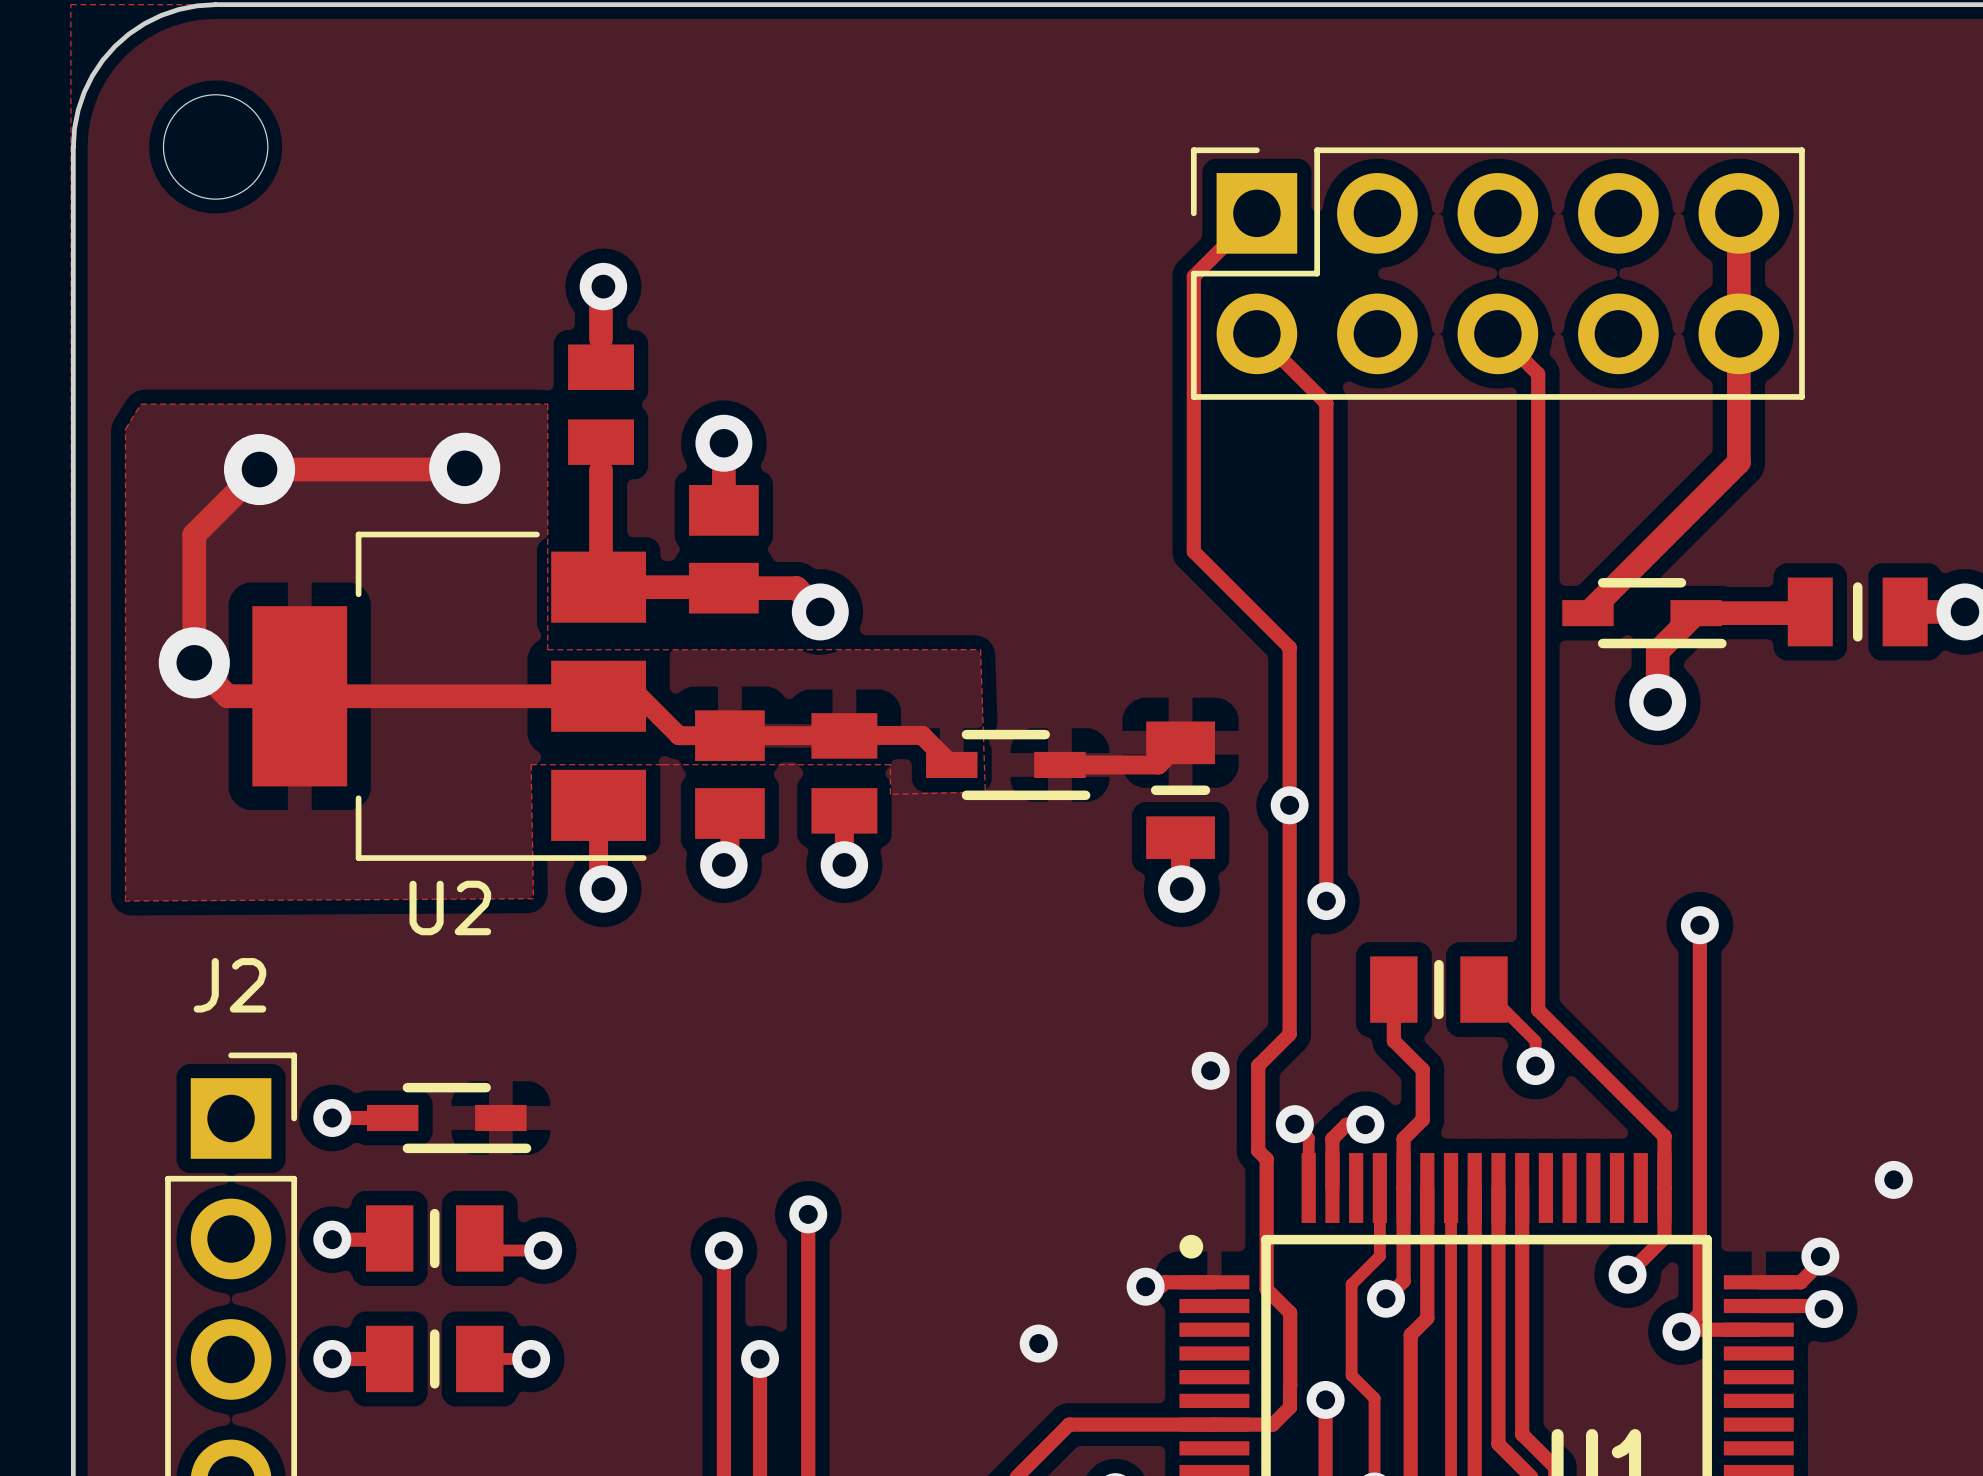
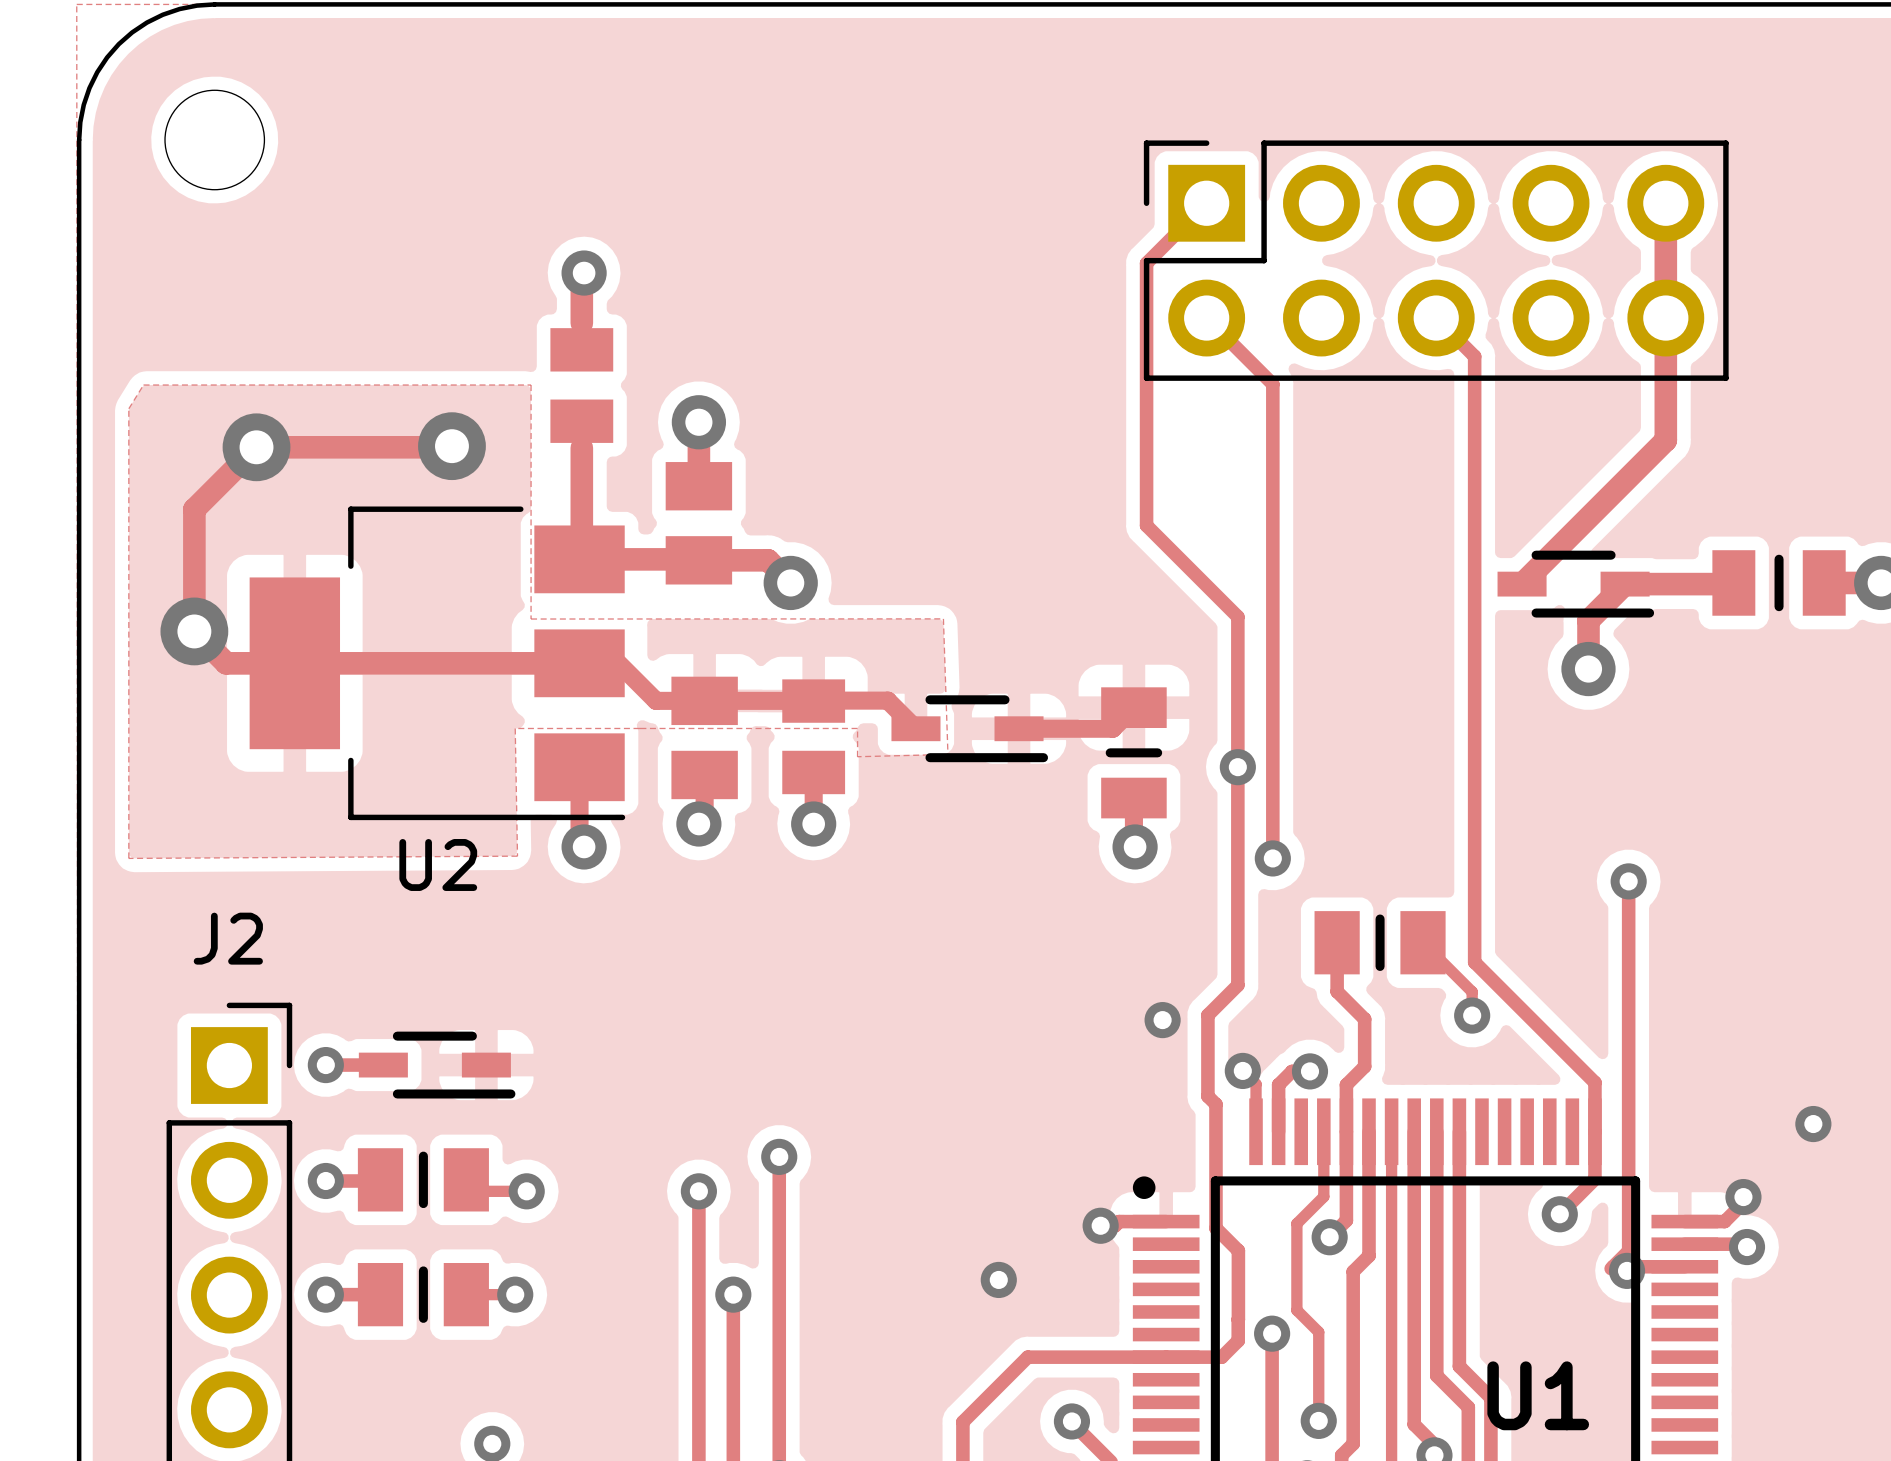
via position: (1681, 1331) -> (1627, 1270)

